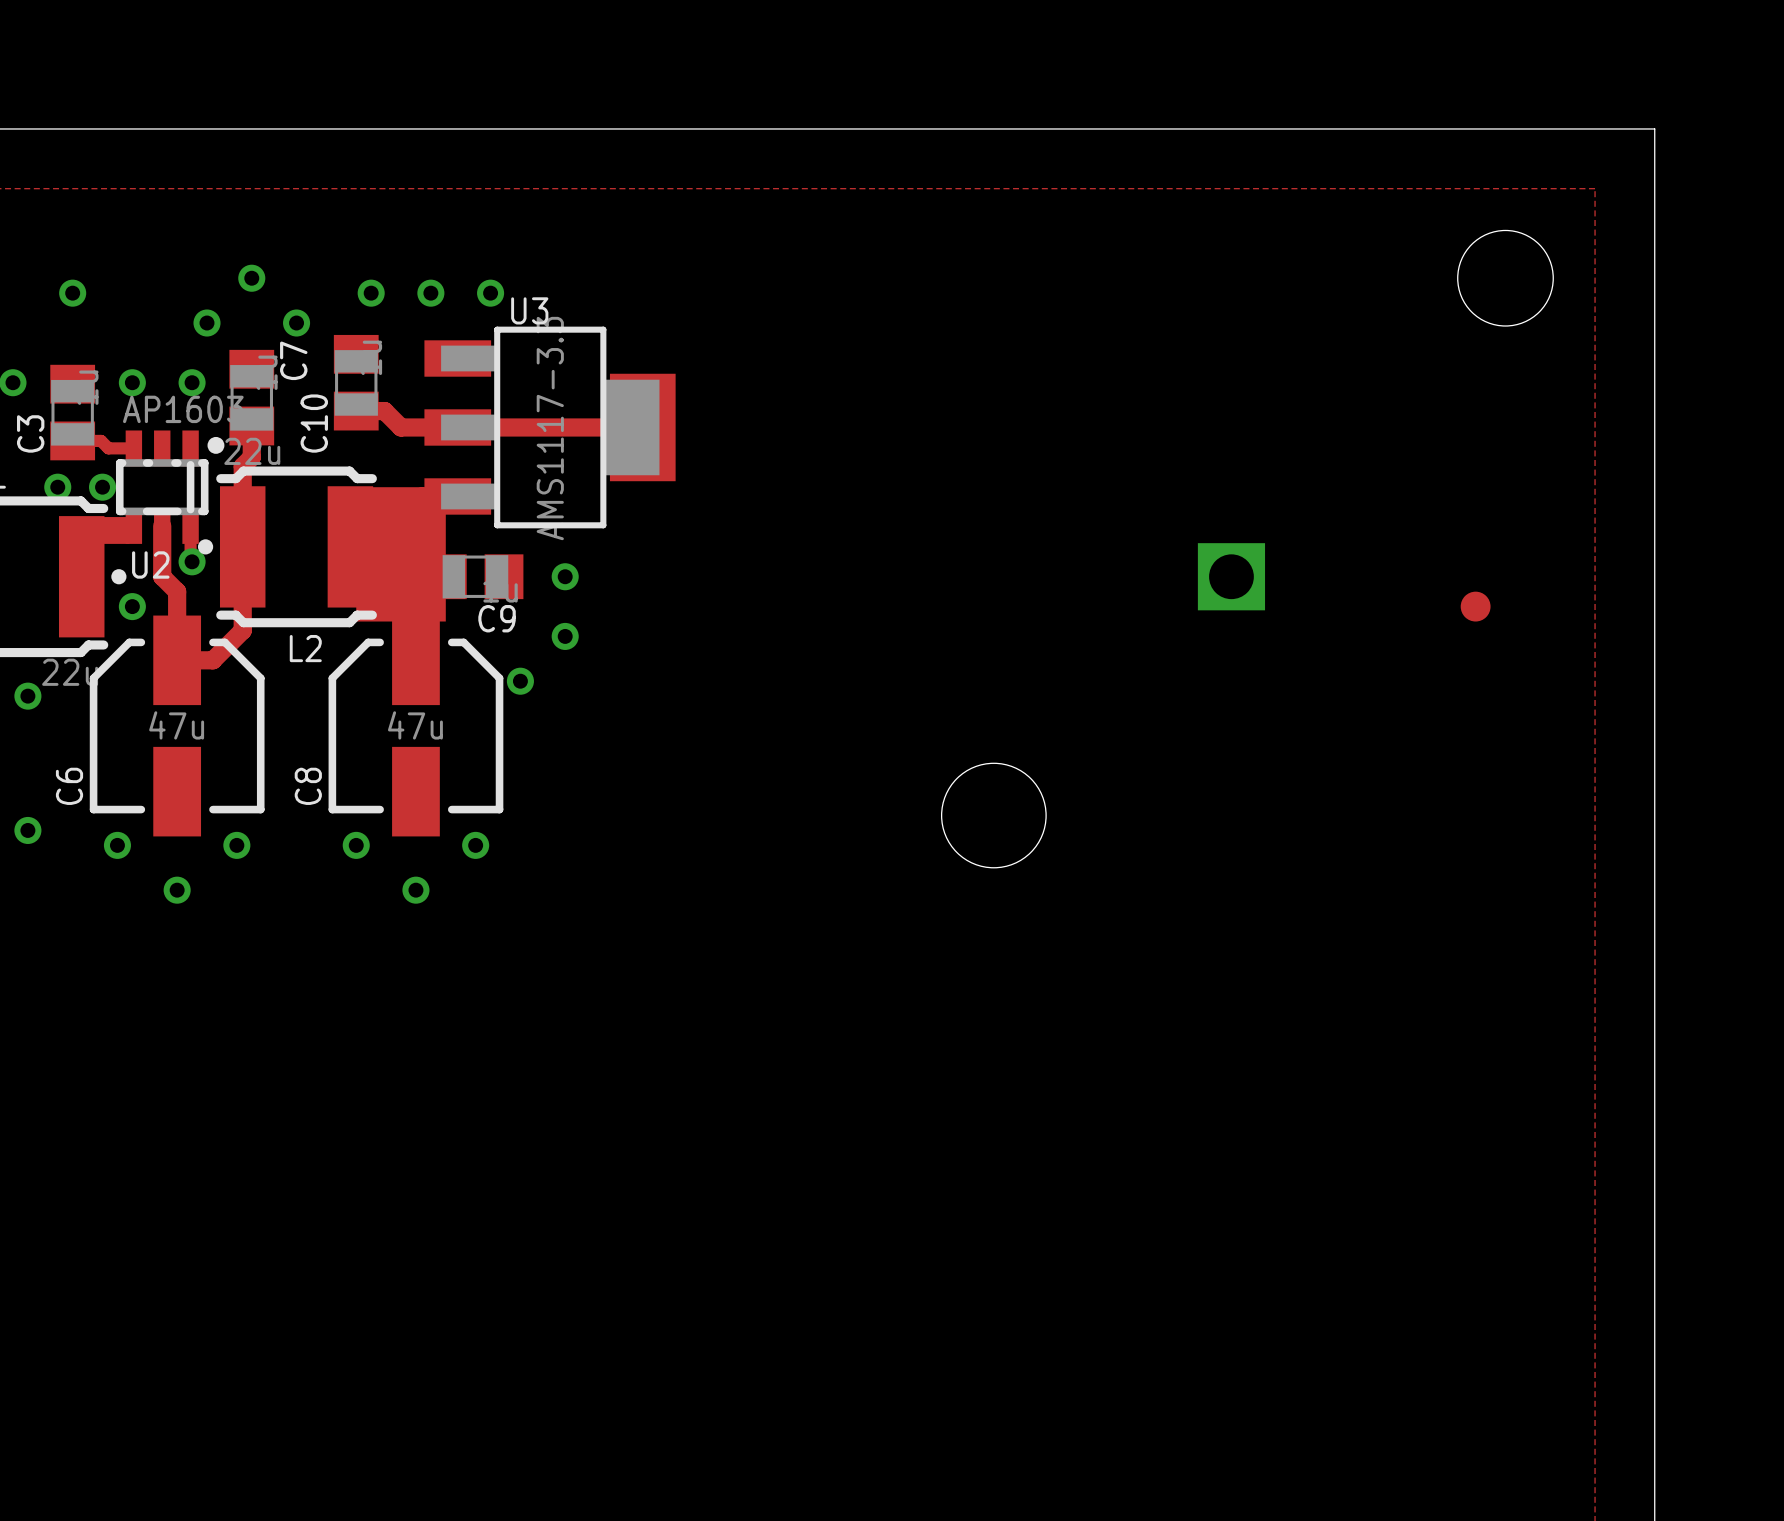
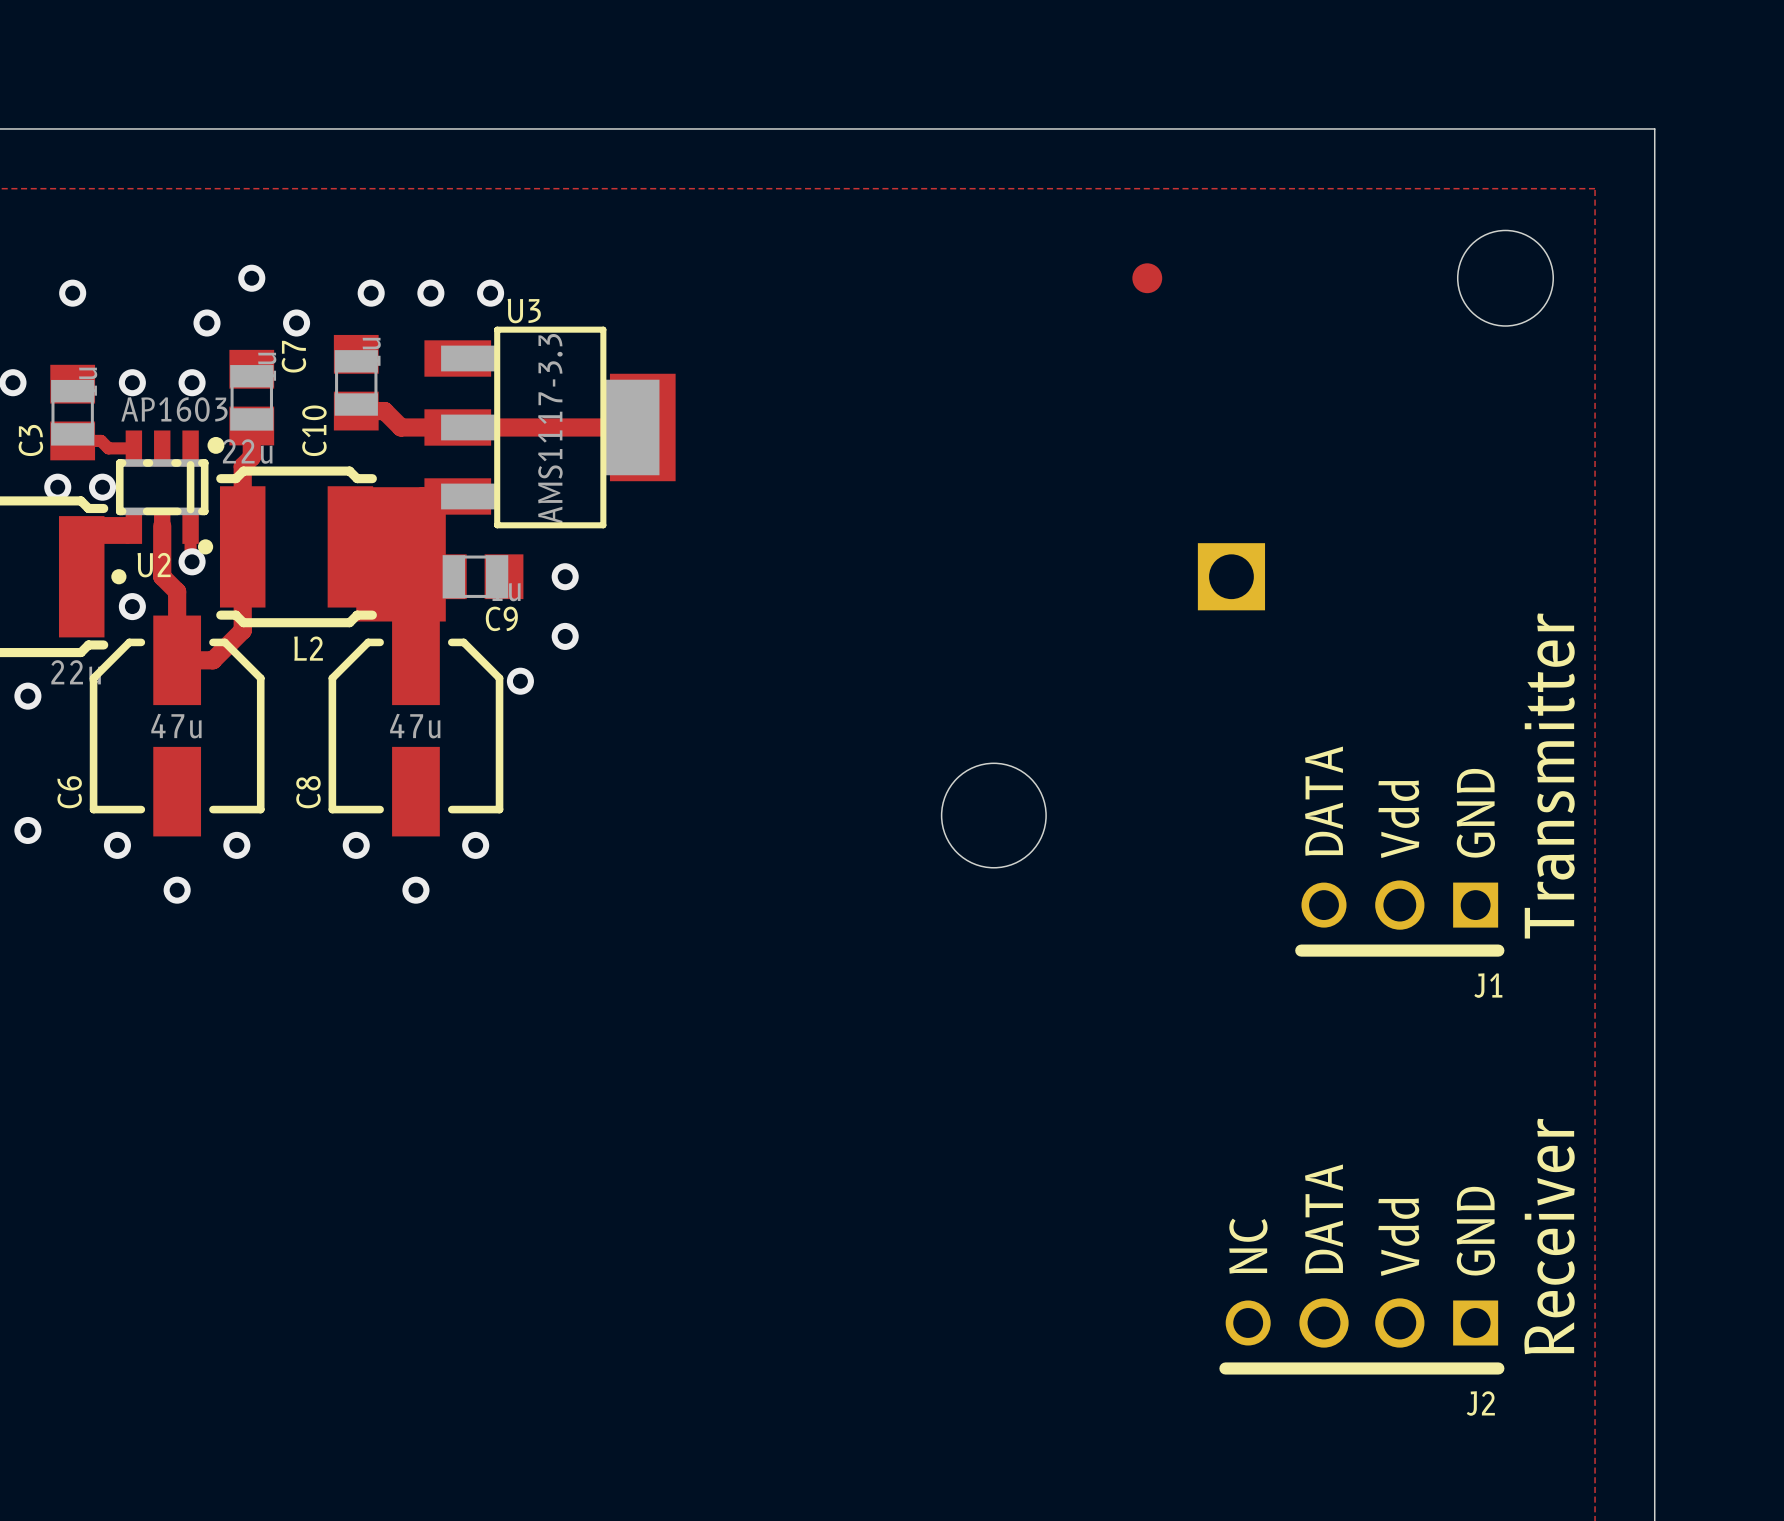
part: none -> (1147, 278)
part: (1475, 606) -> none
J1: none -> Transmitter (1399, 918)
J2: none -> Receiver (1361, 1336)

